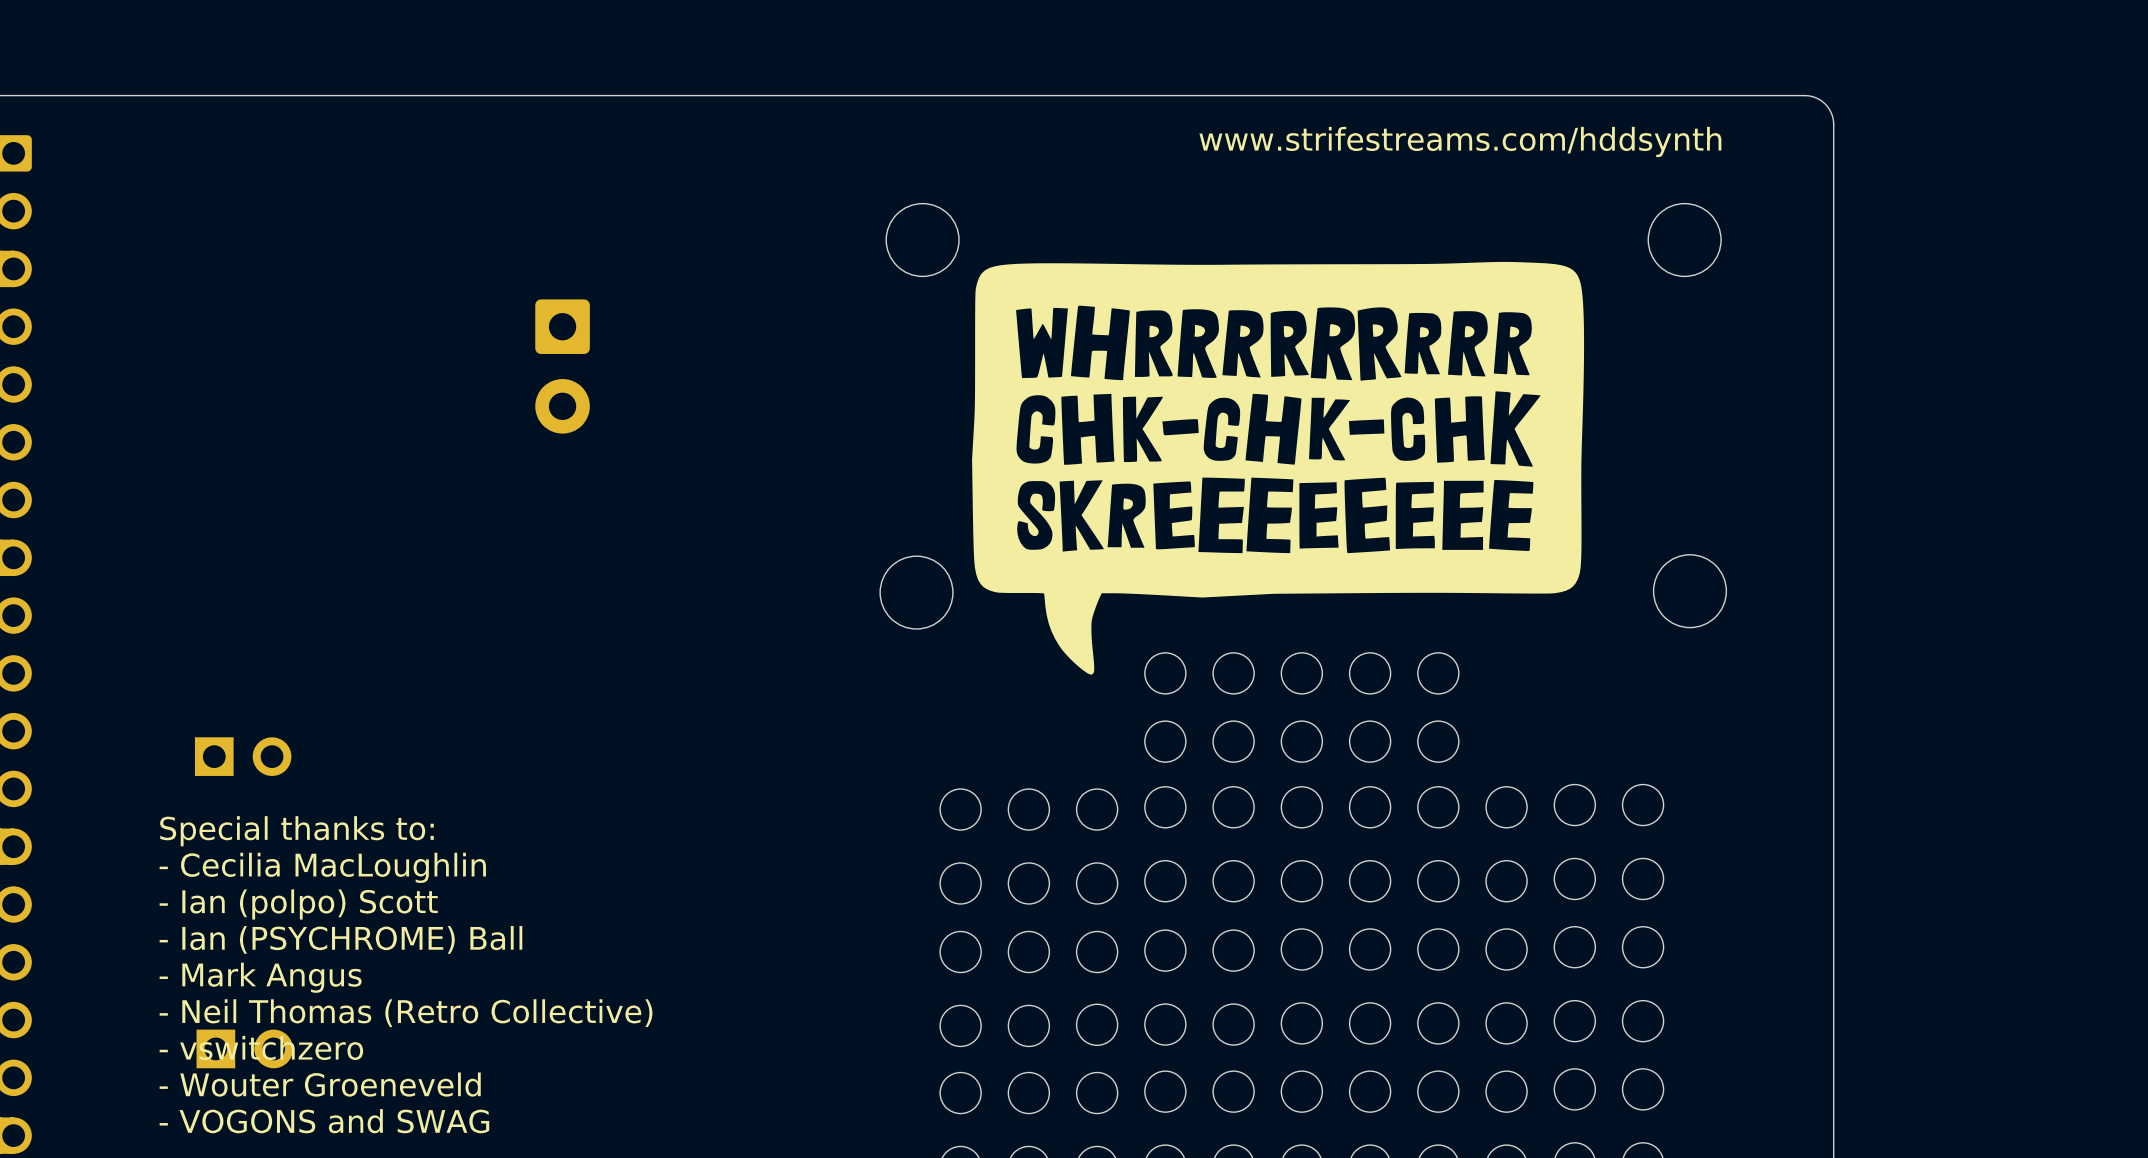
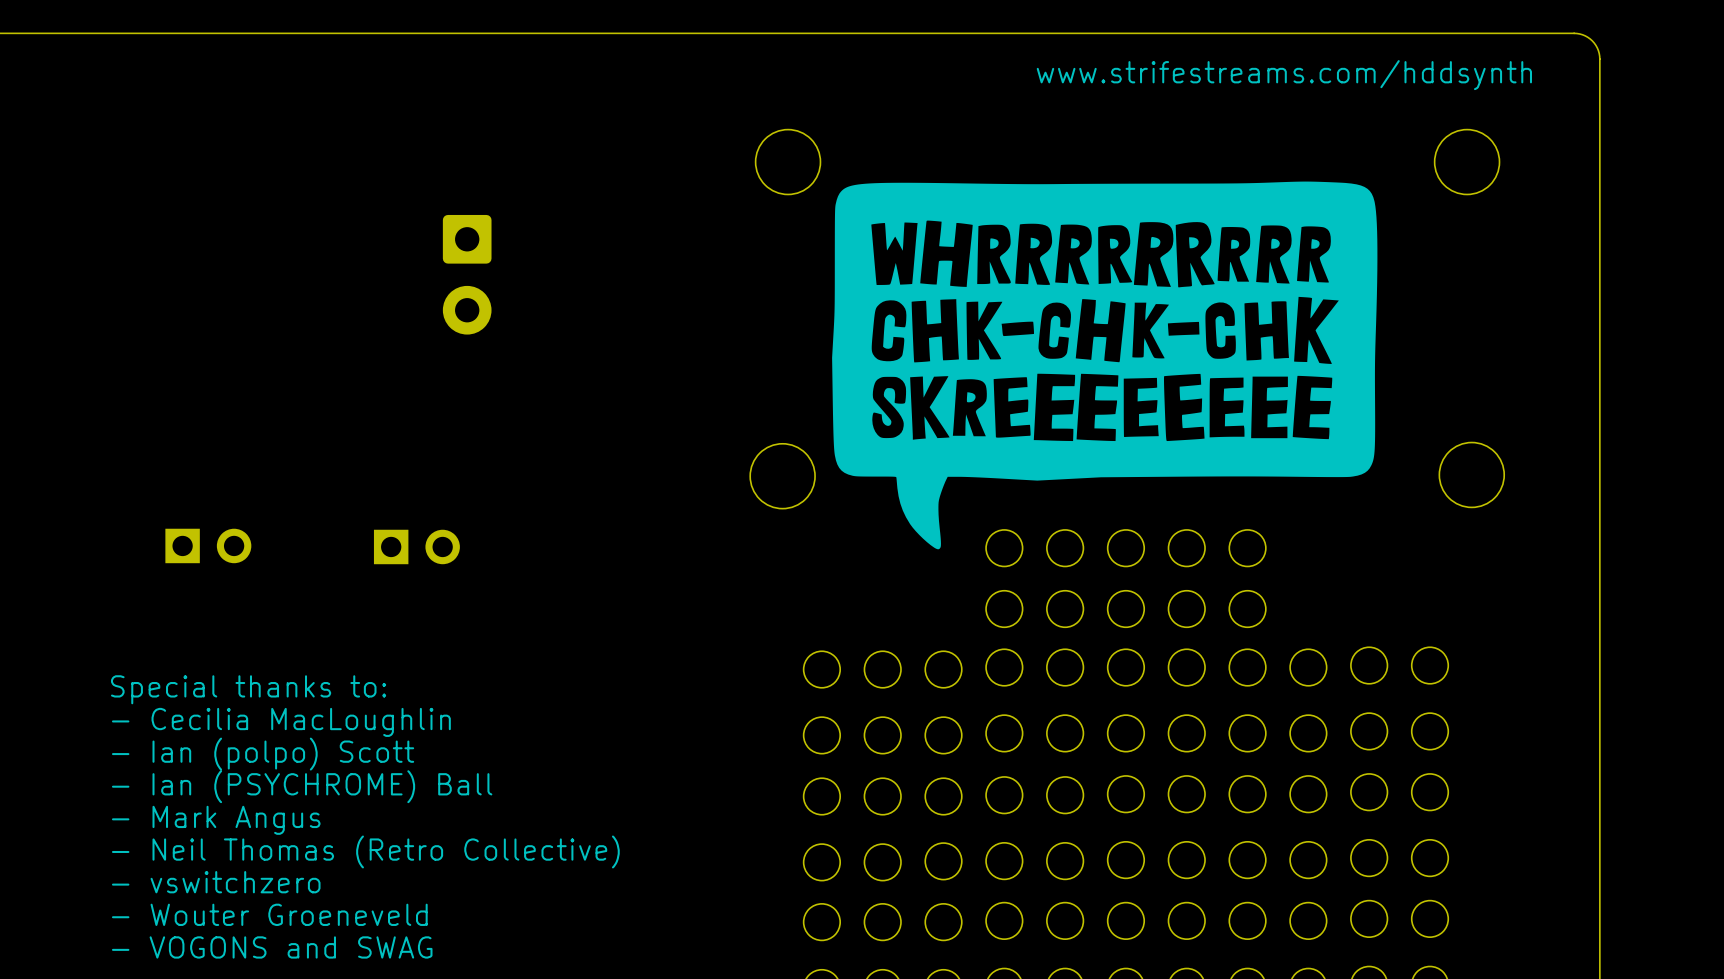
part: none -> (416, 546)
part position: (243, 756) -> (208, 545)
part: (244, 1048) -> none

